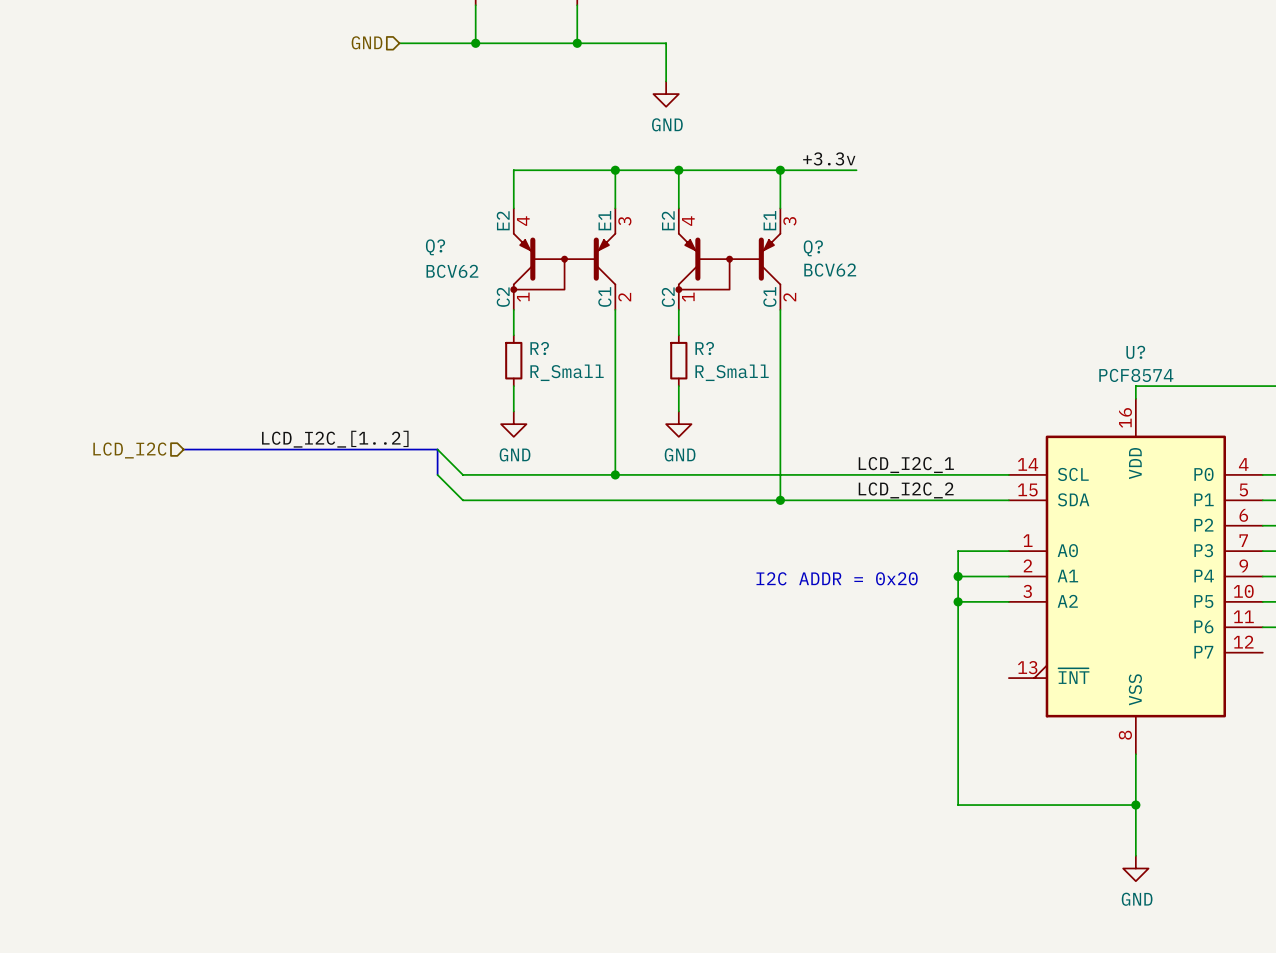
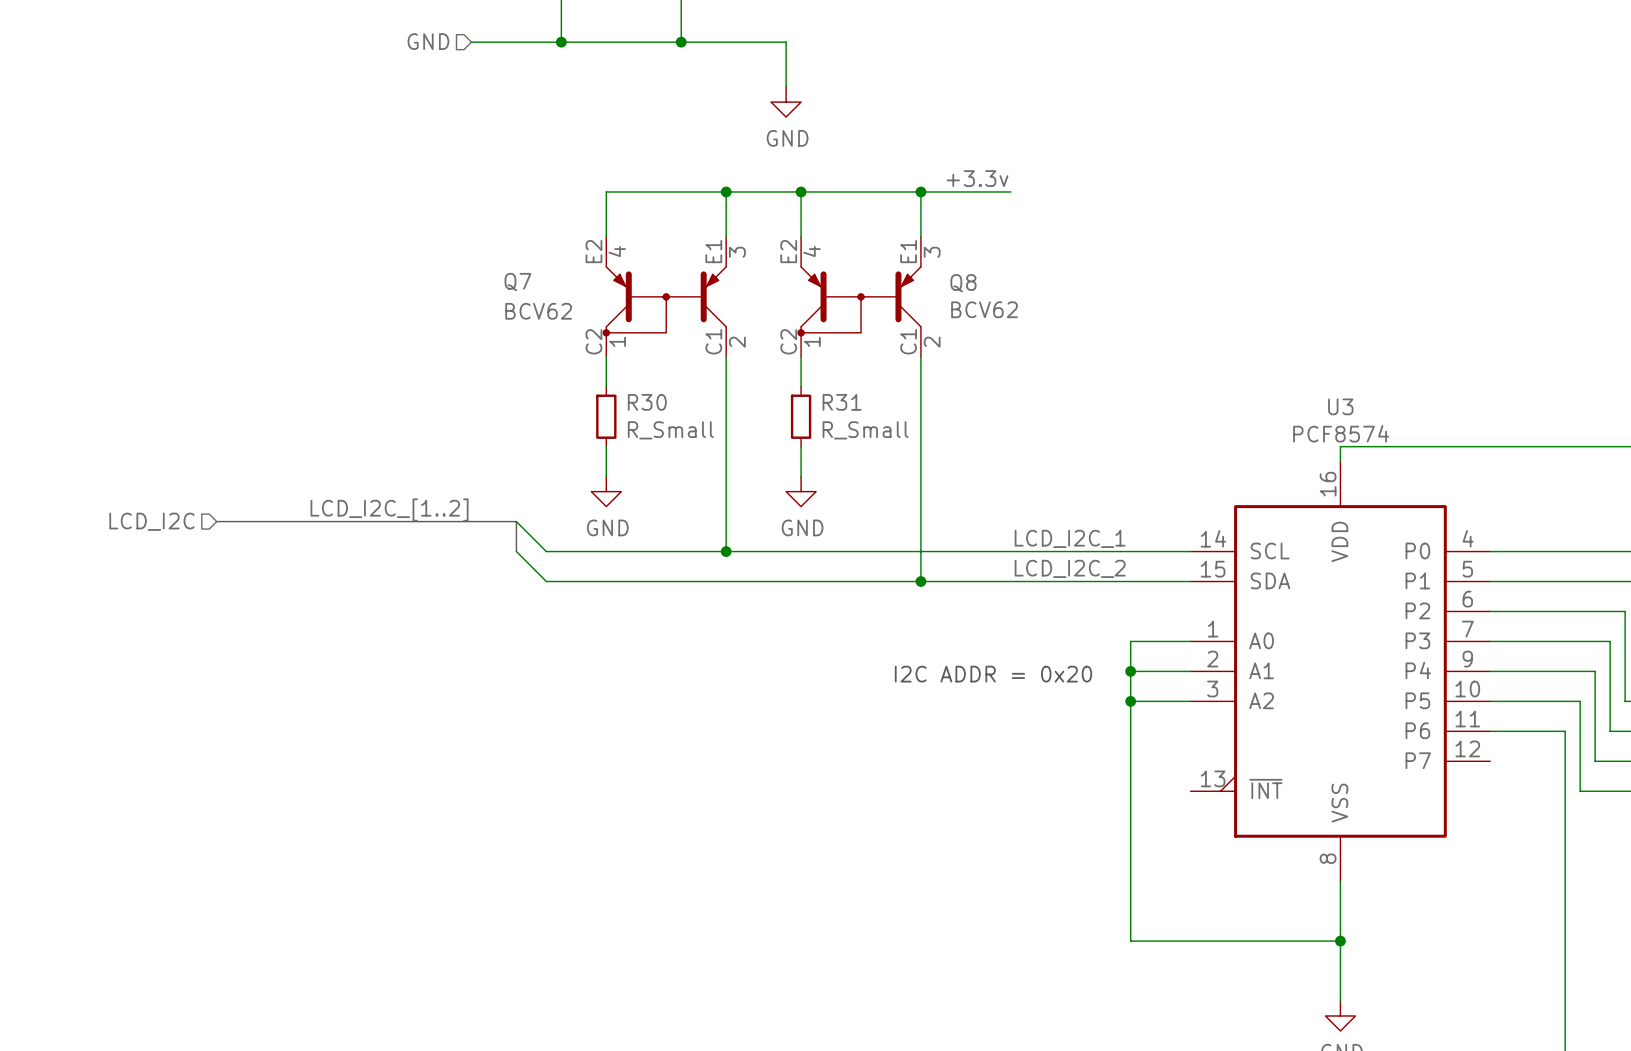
Q? name: Q? (435, 247) -> Q7 (517, 282)
Q? name: Q? (813, 248) -> Q8 (963, 283)
R? name: R? (539, 348) -> R30 (647, 402)
R? name: R? (704, 348) -> R31 (842, 402)
U? name: U? (1135, 352) -> U3 (1340, 406)

